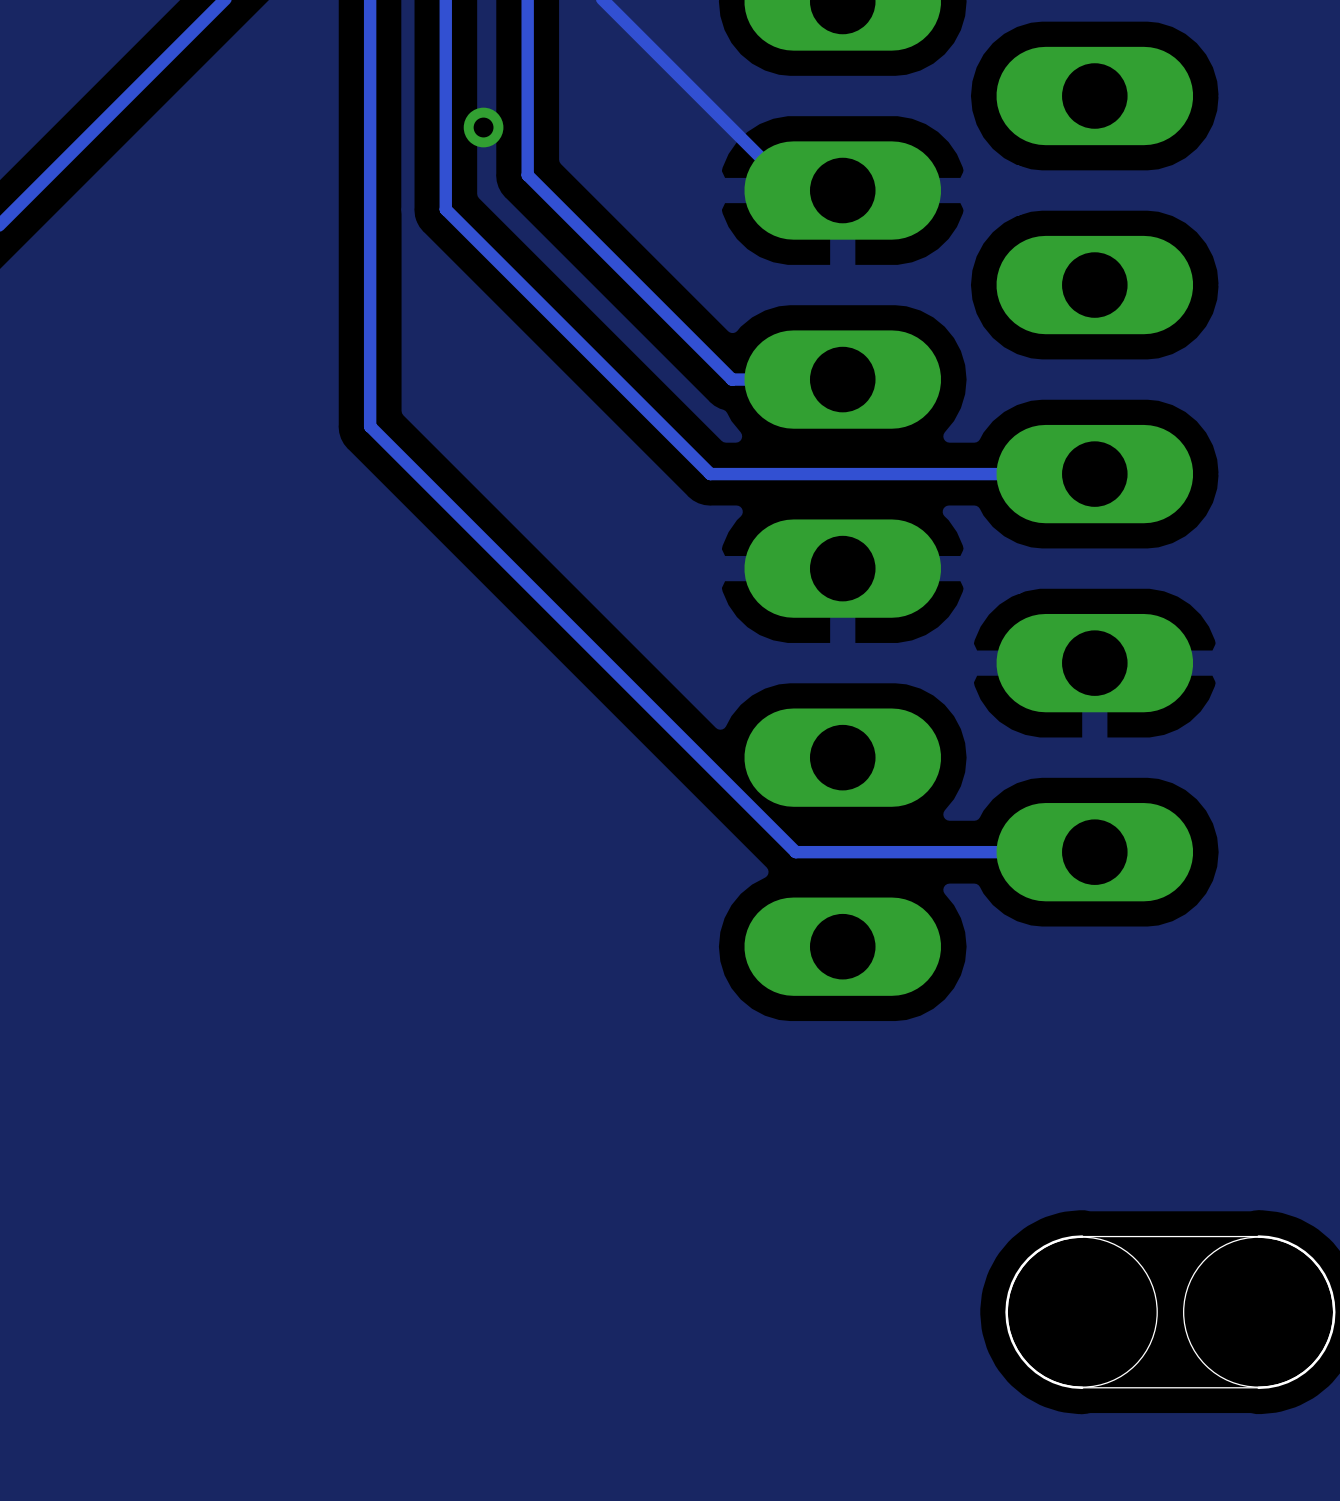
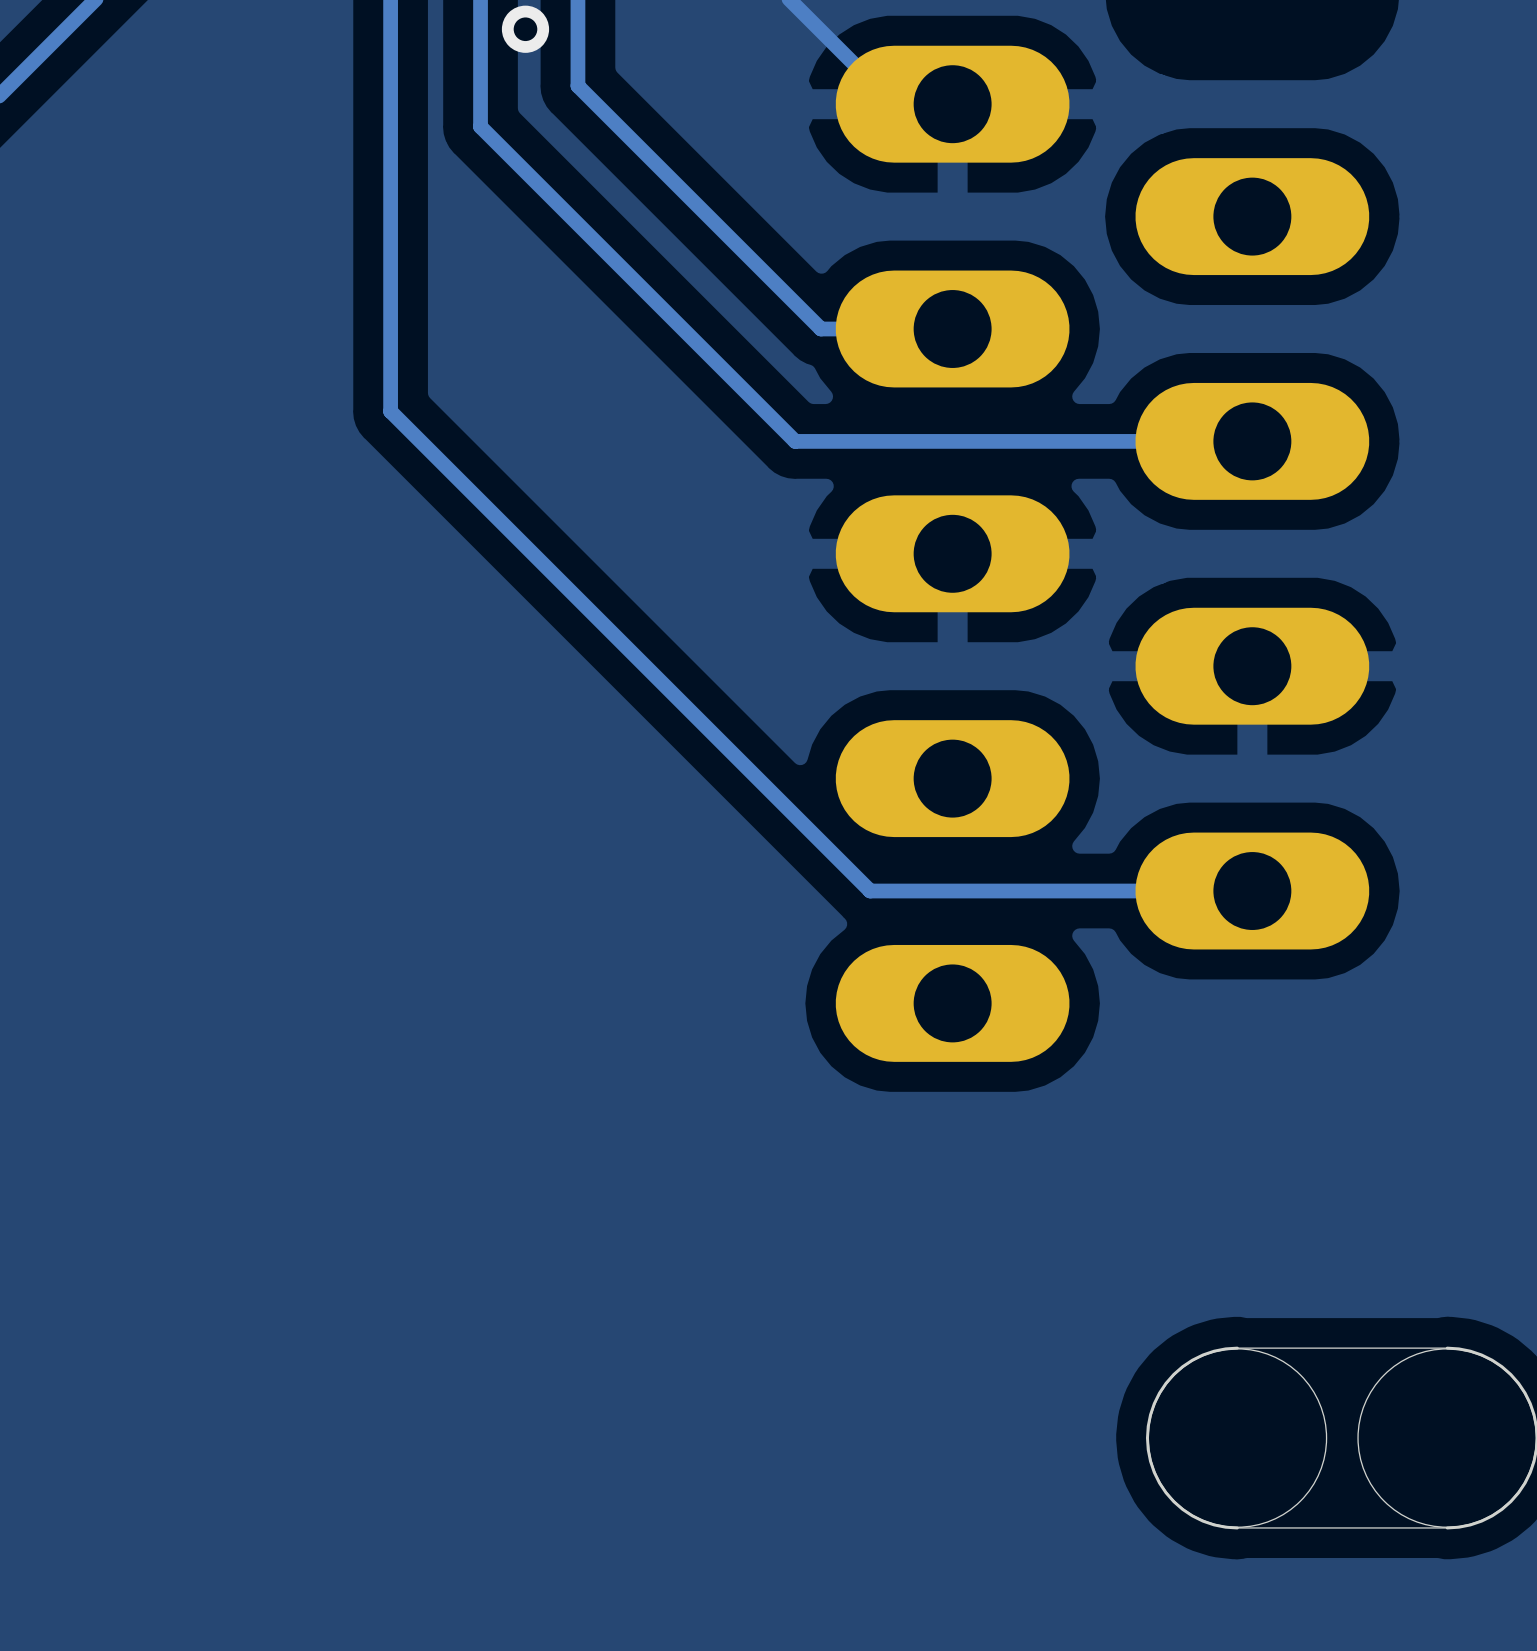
track: (370, 426) (795, 852) -> (390, 384) (390, 411) (870, 891) (896, 891)

